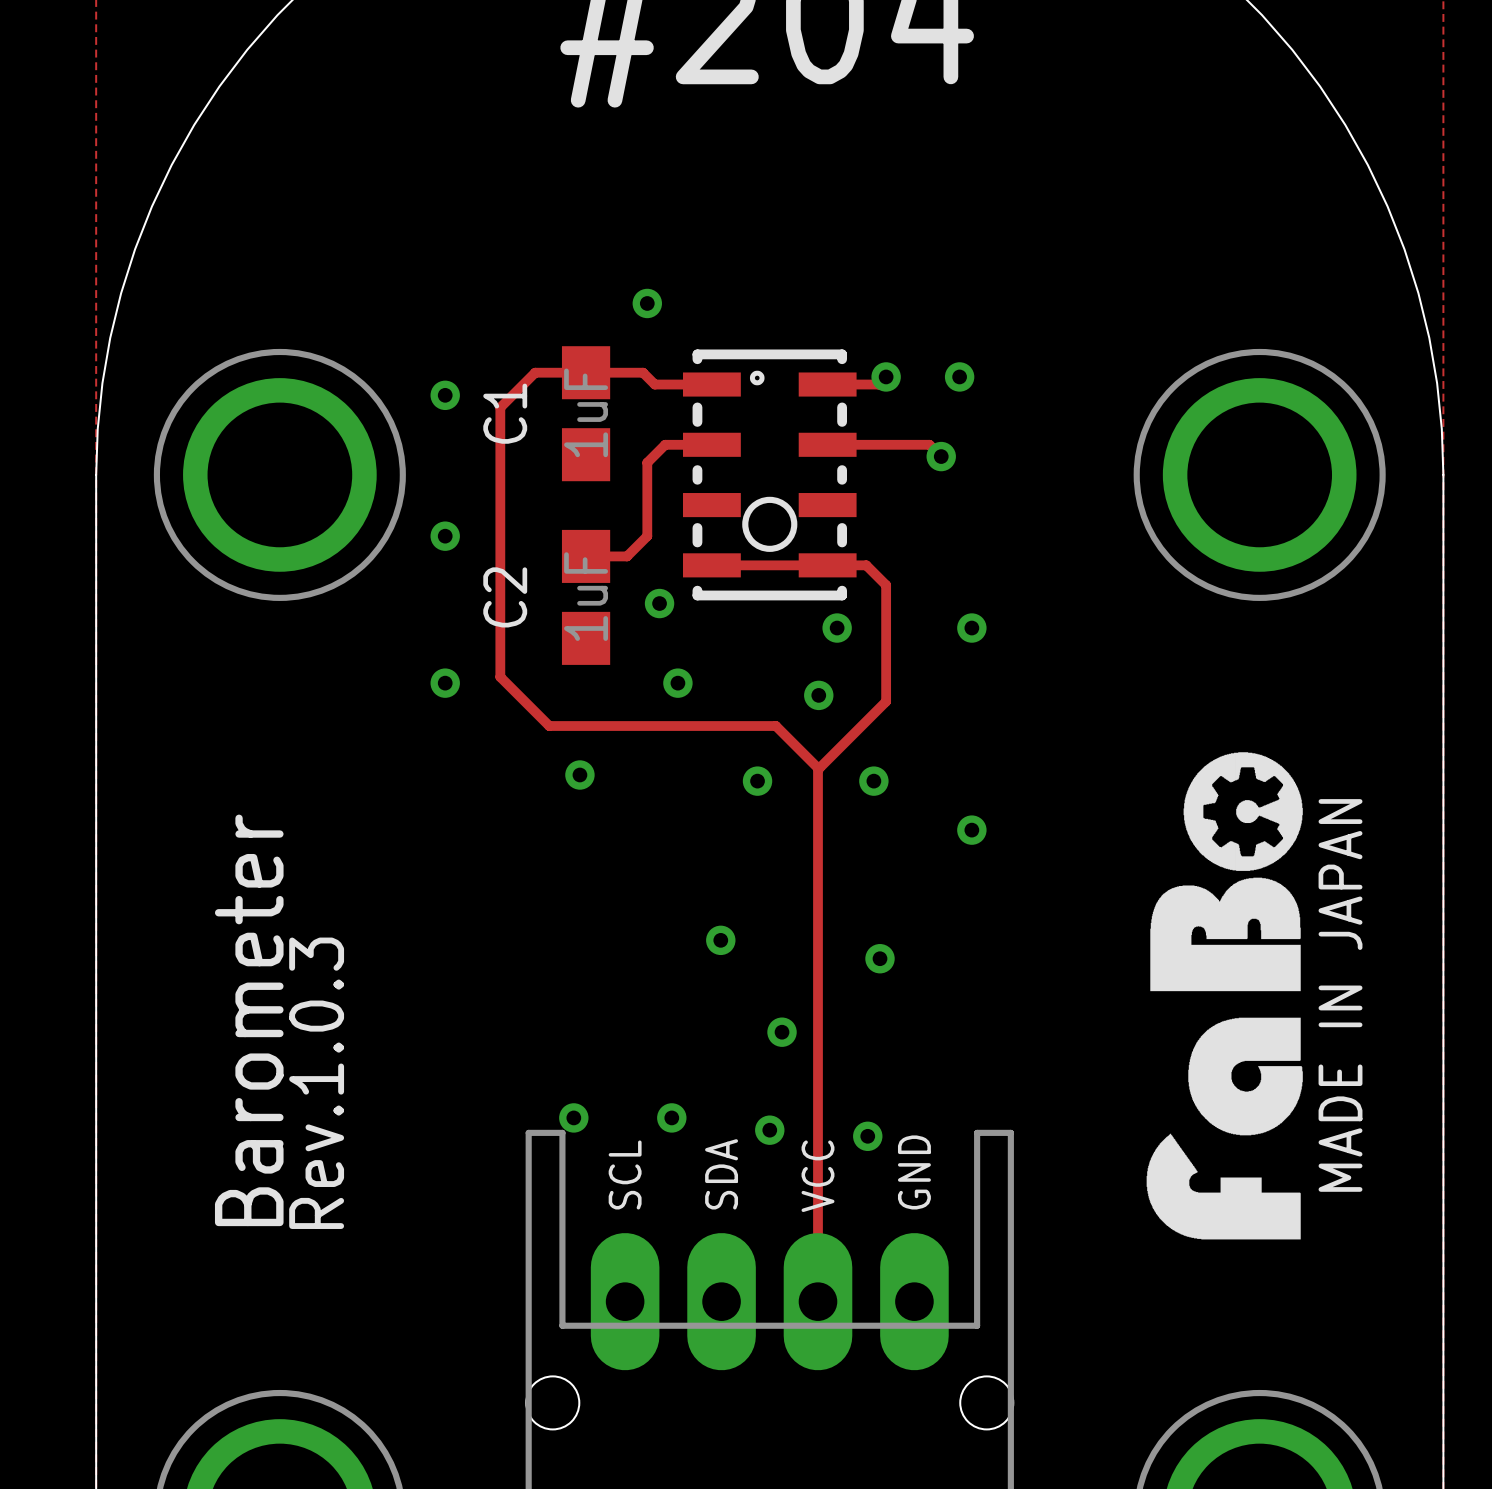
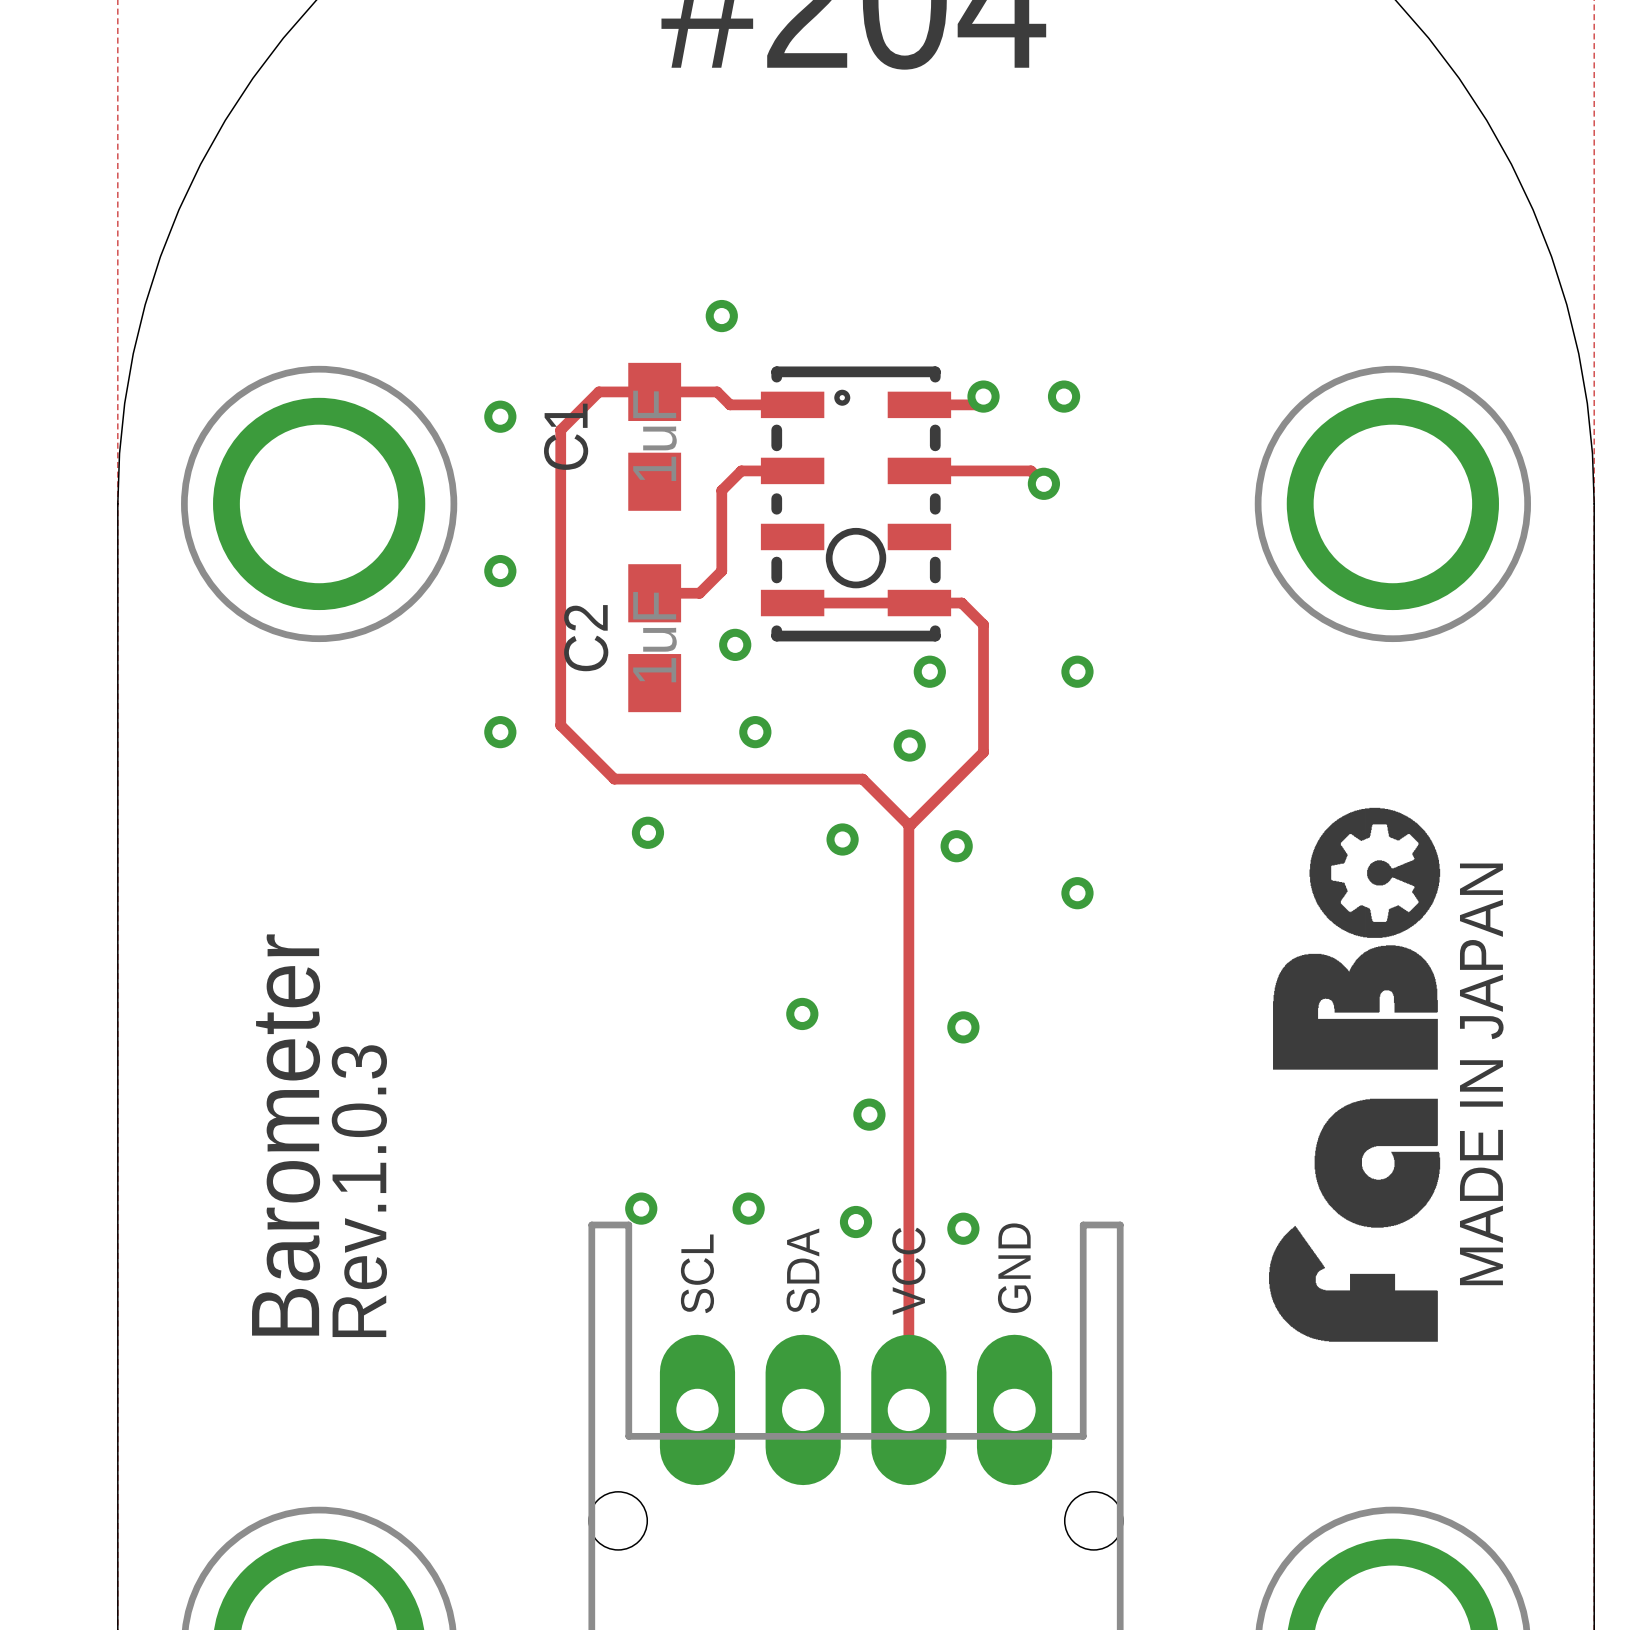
C2 name position: C2 (505, 597) -> C2 (586, 638)
via position: (873, 781) -> (956, 846)
via position: (880, 958) -> (963, 1027)

